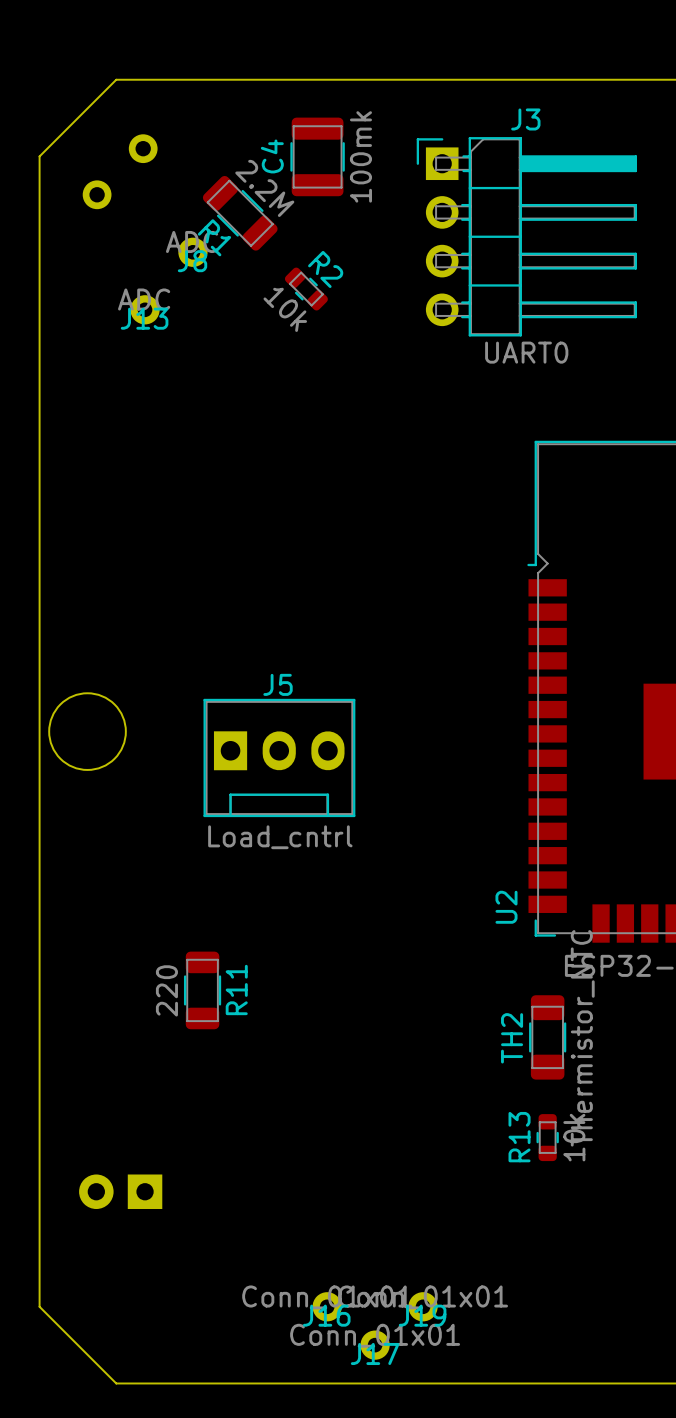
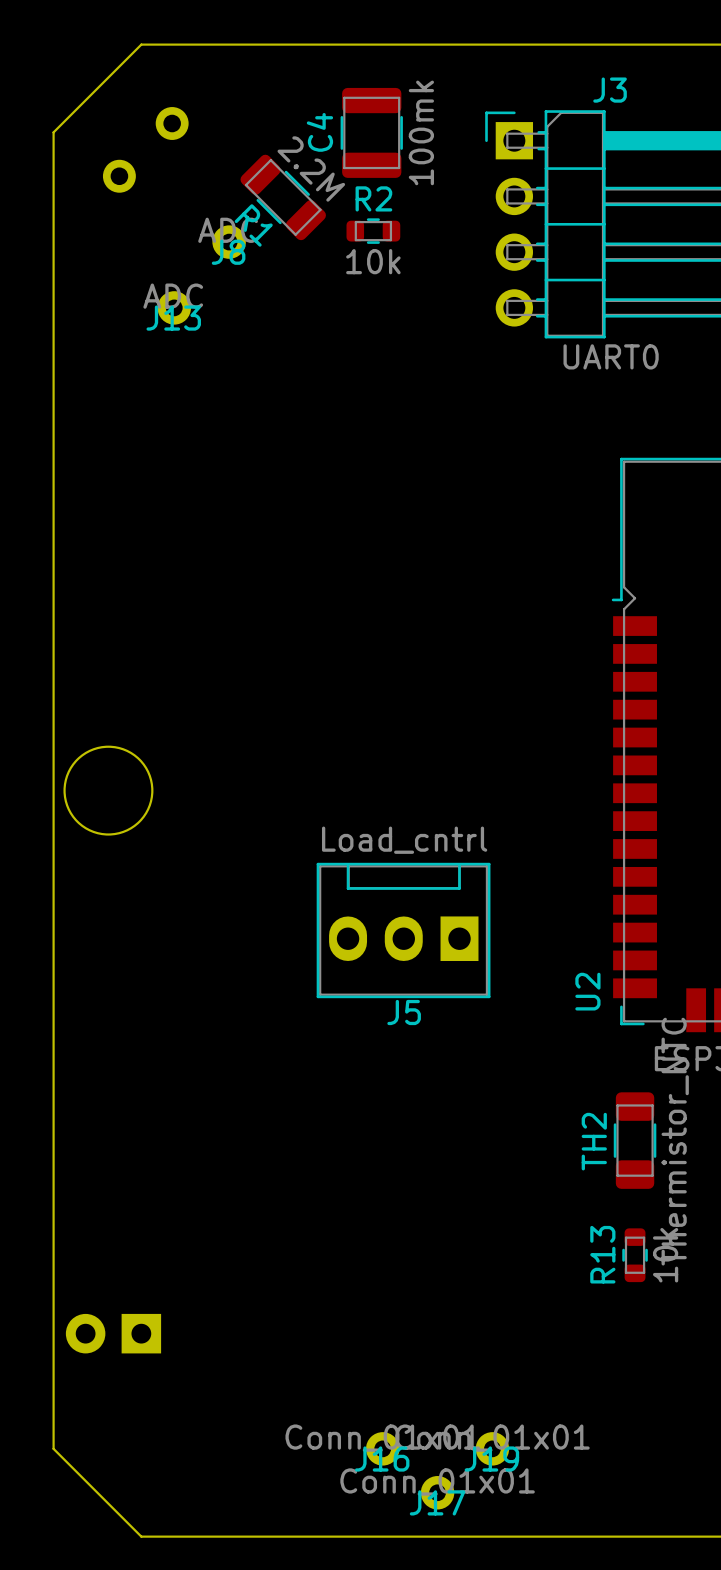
R2 rotation: 0° (306, 289) -> 45° counterclockwise (373, 231)
R2 position: (306, 289) -> (373, 231)
J5 rotation: 0° (279, 757) -> 180° (403, 930)
J5 position: (279, 757) -> (403, 930)
R11: 220 (202, 990) -> none
part position: (120, 1191) -> (113, 1333)

